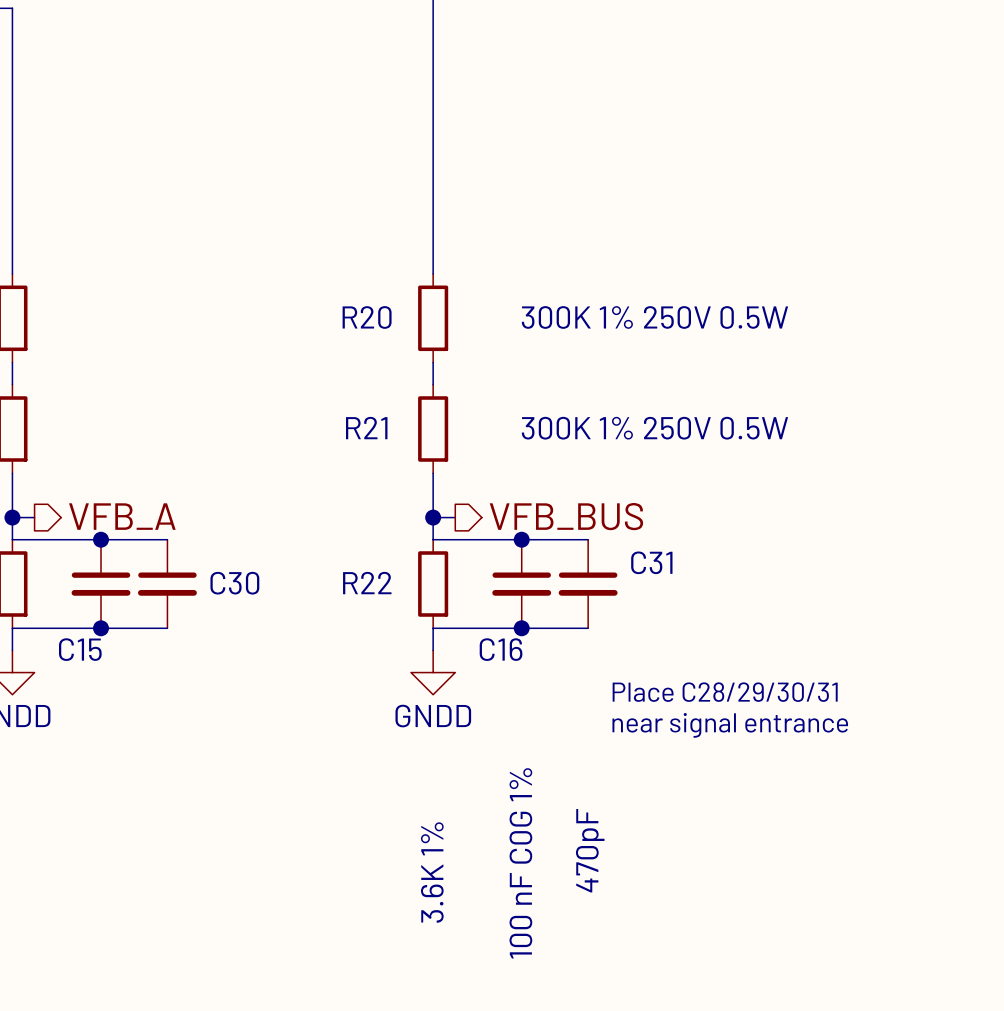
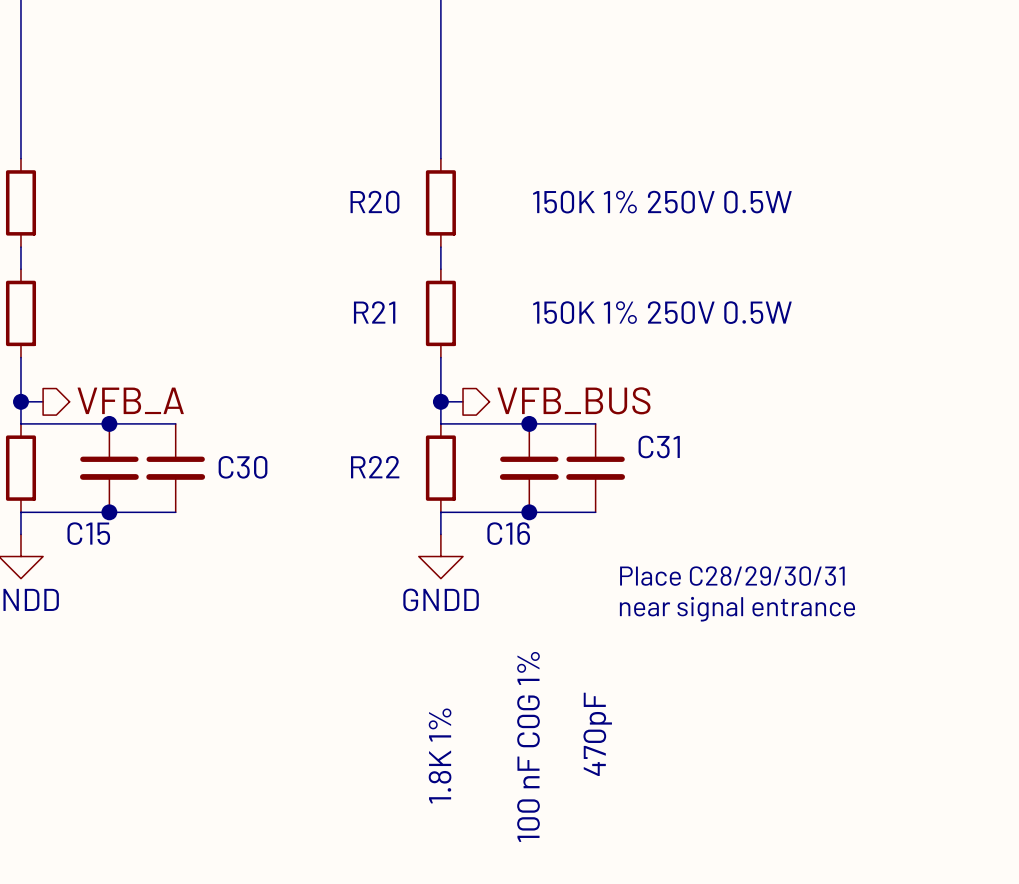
R20 value: 300K 1% 250V 0.5W (654, 317) -> 150K 1% 250V 0.5W (662, 202)
R21 value: 300K 1% 250V 0.5W (654, 428) -> 150K 1% 250V 0.5W (662, 312)
R22 value: 3.6K 1% (432, 872) -> 1.8K 1% (440, 755)

